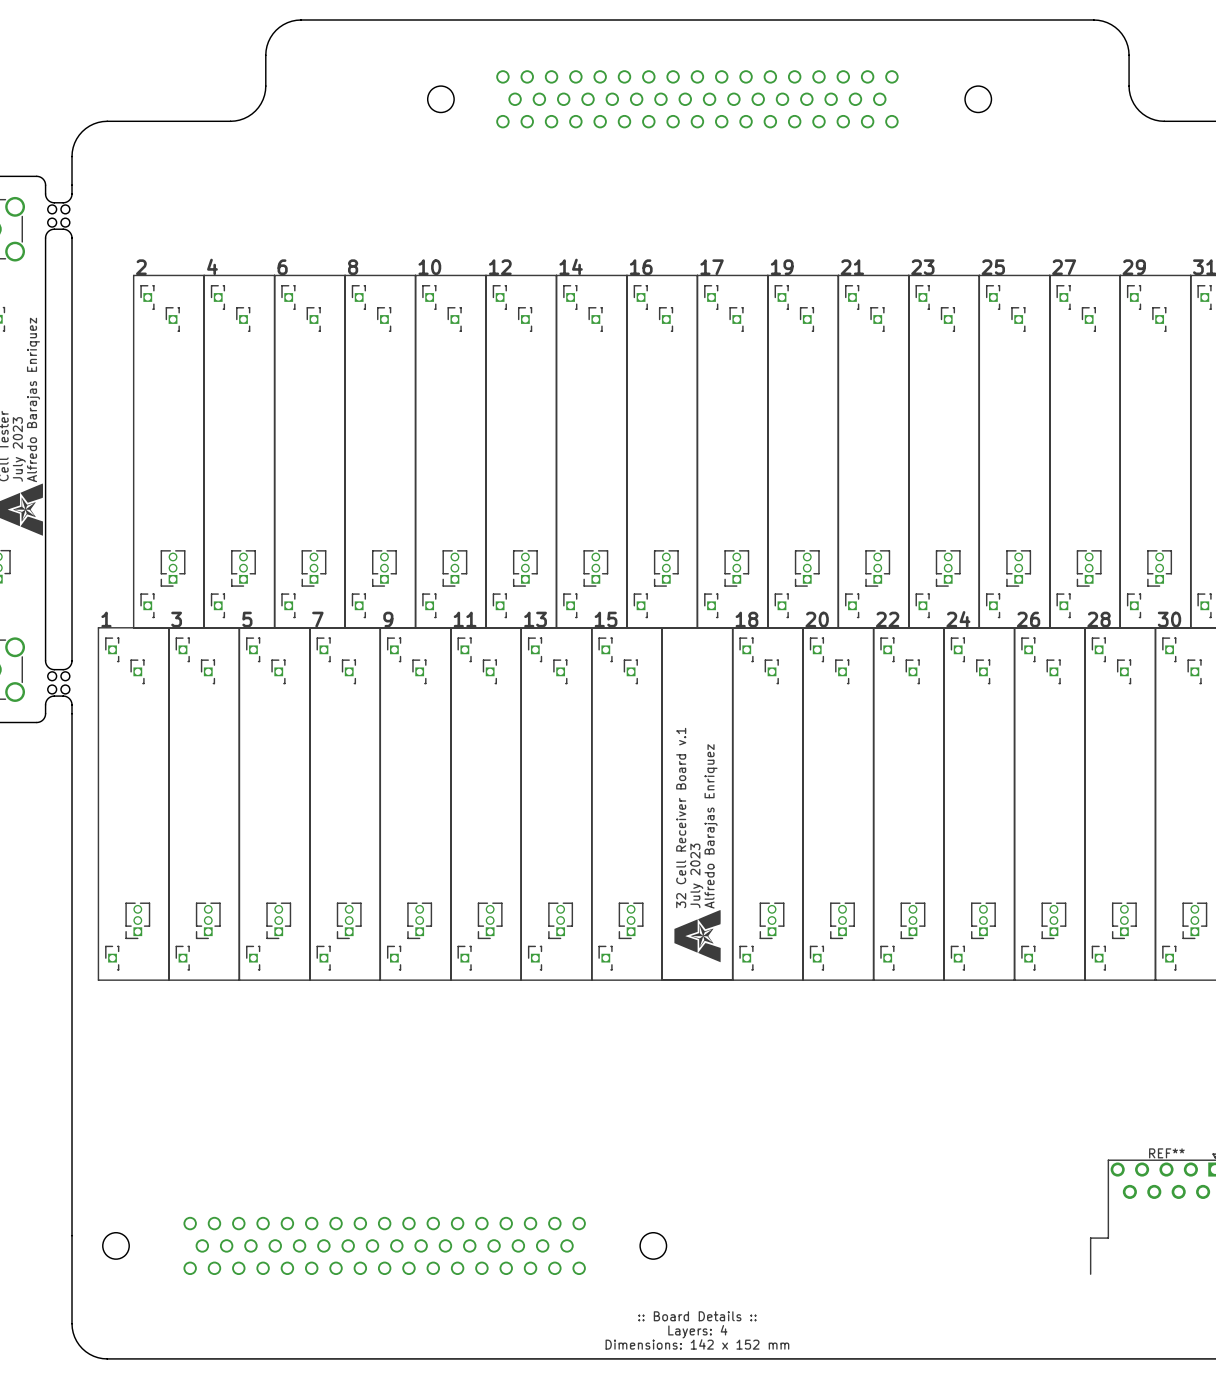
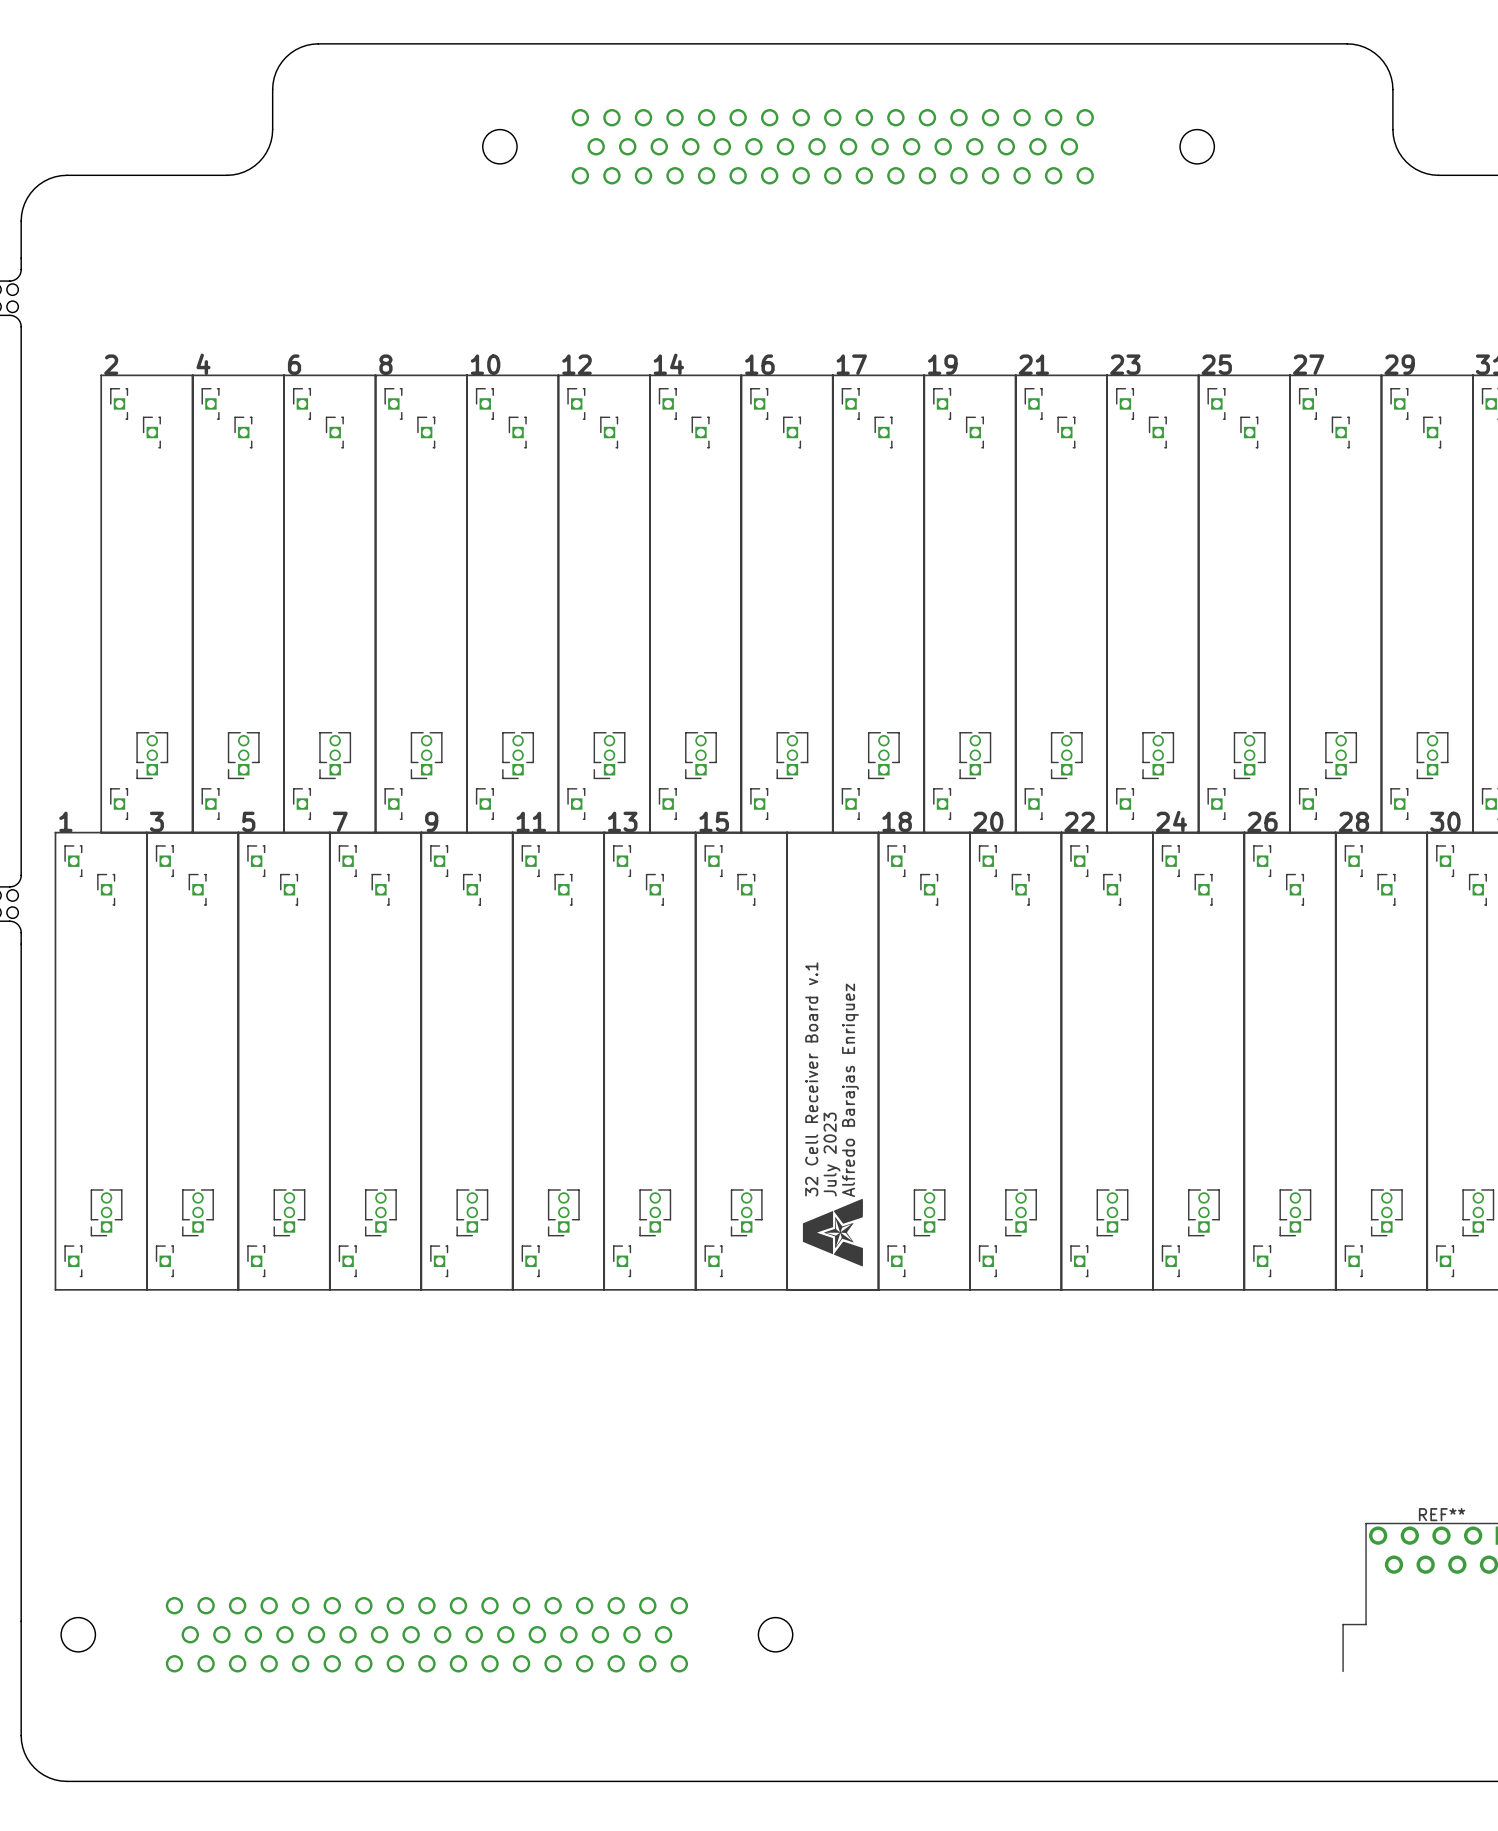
text: :: Board Details :: (697, 1316) -> none
text: Layers: 4 (697, 1331) -> none
text: Dimensions: 142 x 152 mm (697, 1344) -> none

